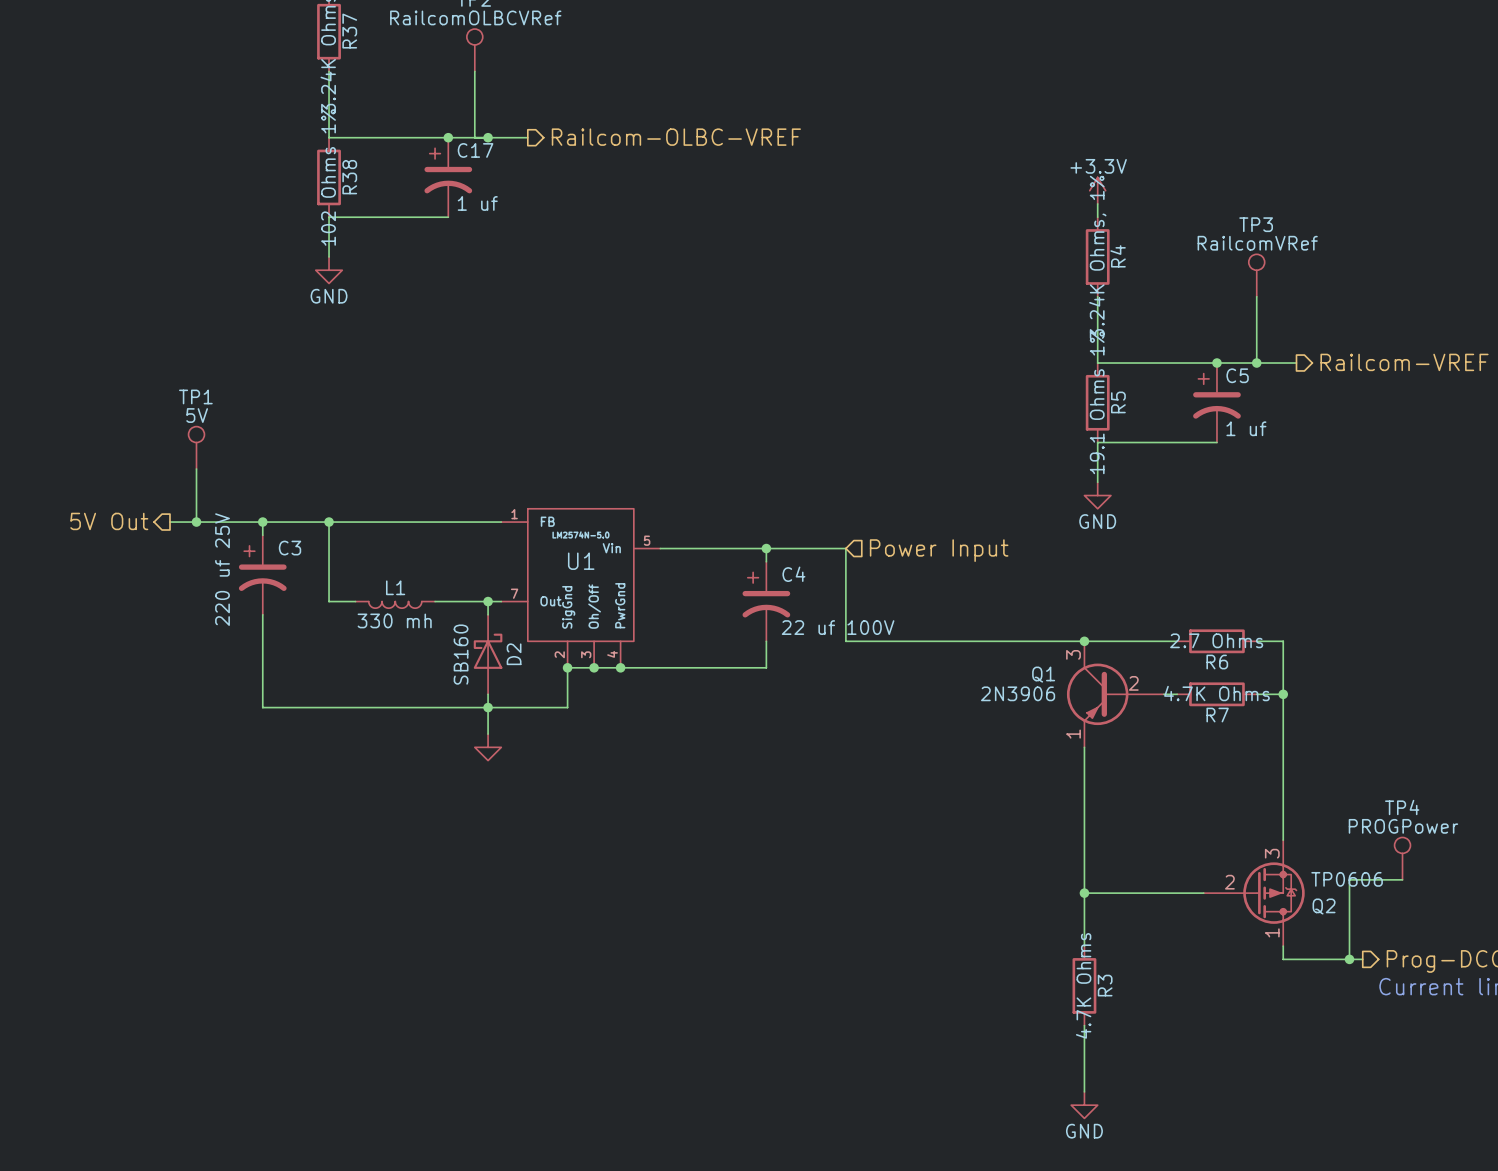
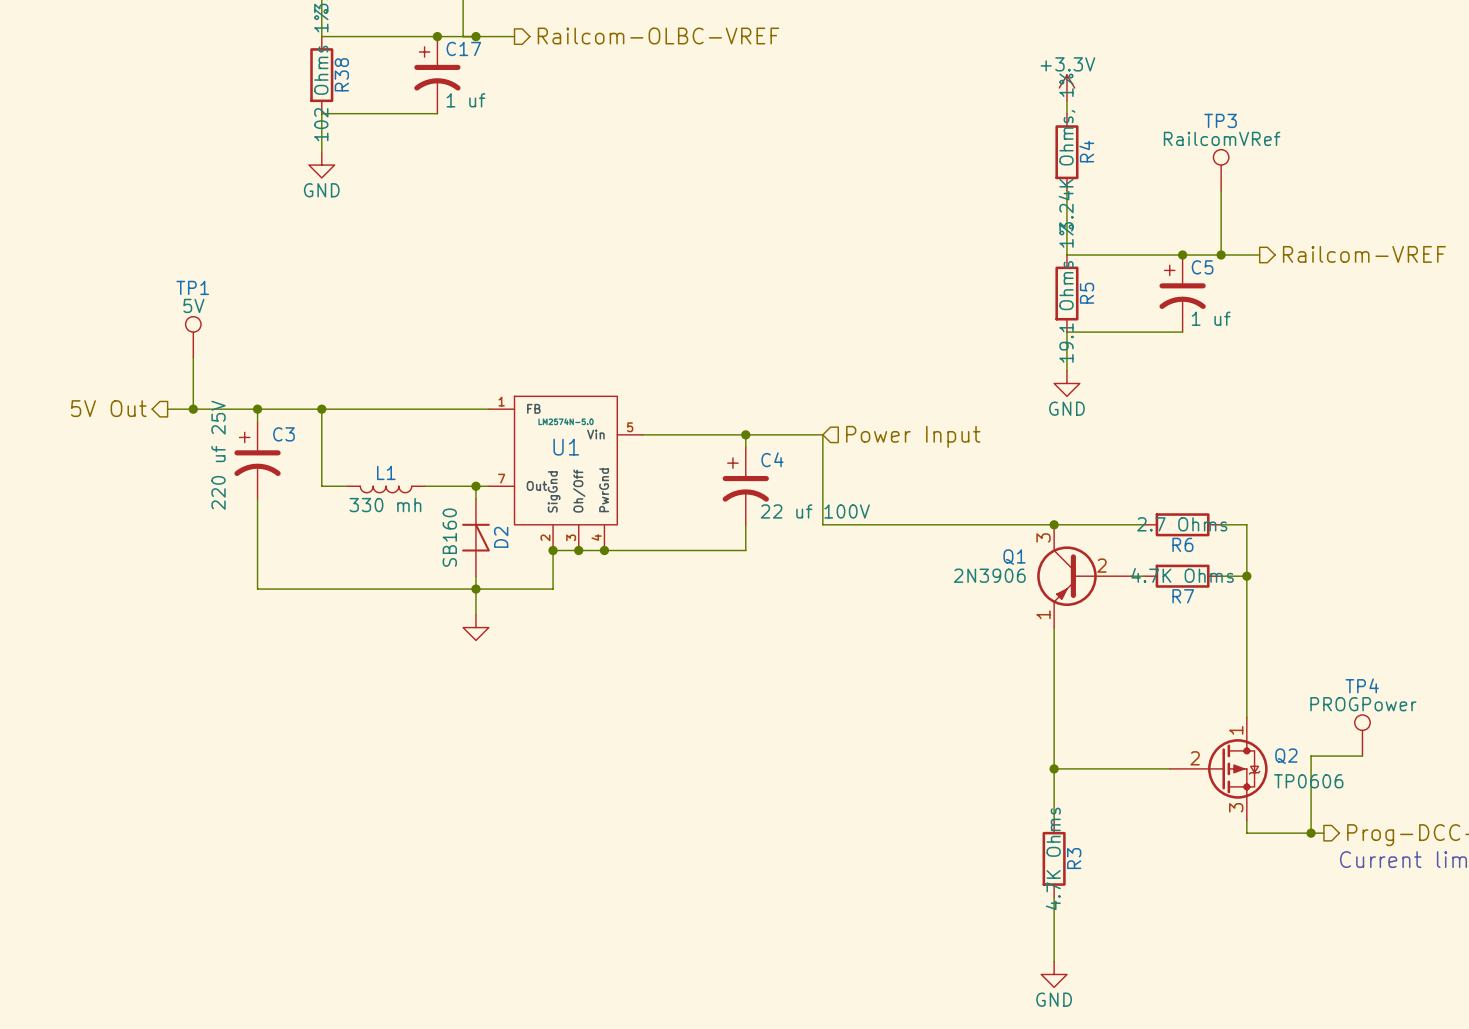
D2 symbol: [473, 614, 503, 695] -> [462, 499, 490, 577]
Q2 flip: as is (1273, 893) -> up-down (1237, 768)

